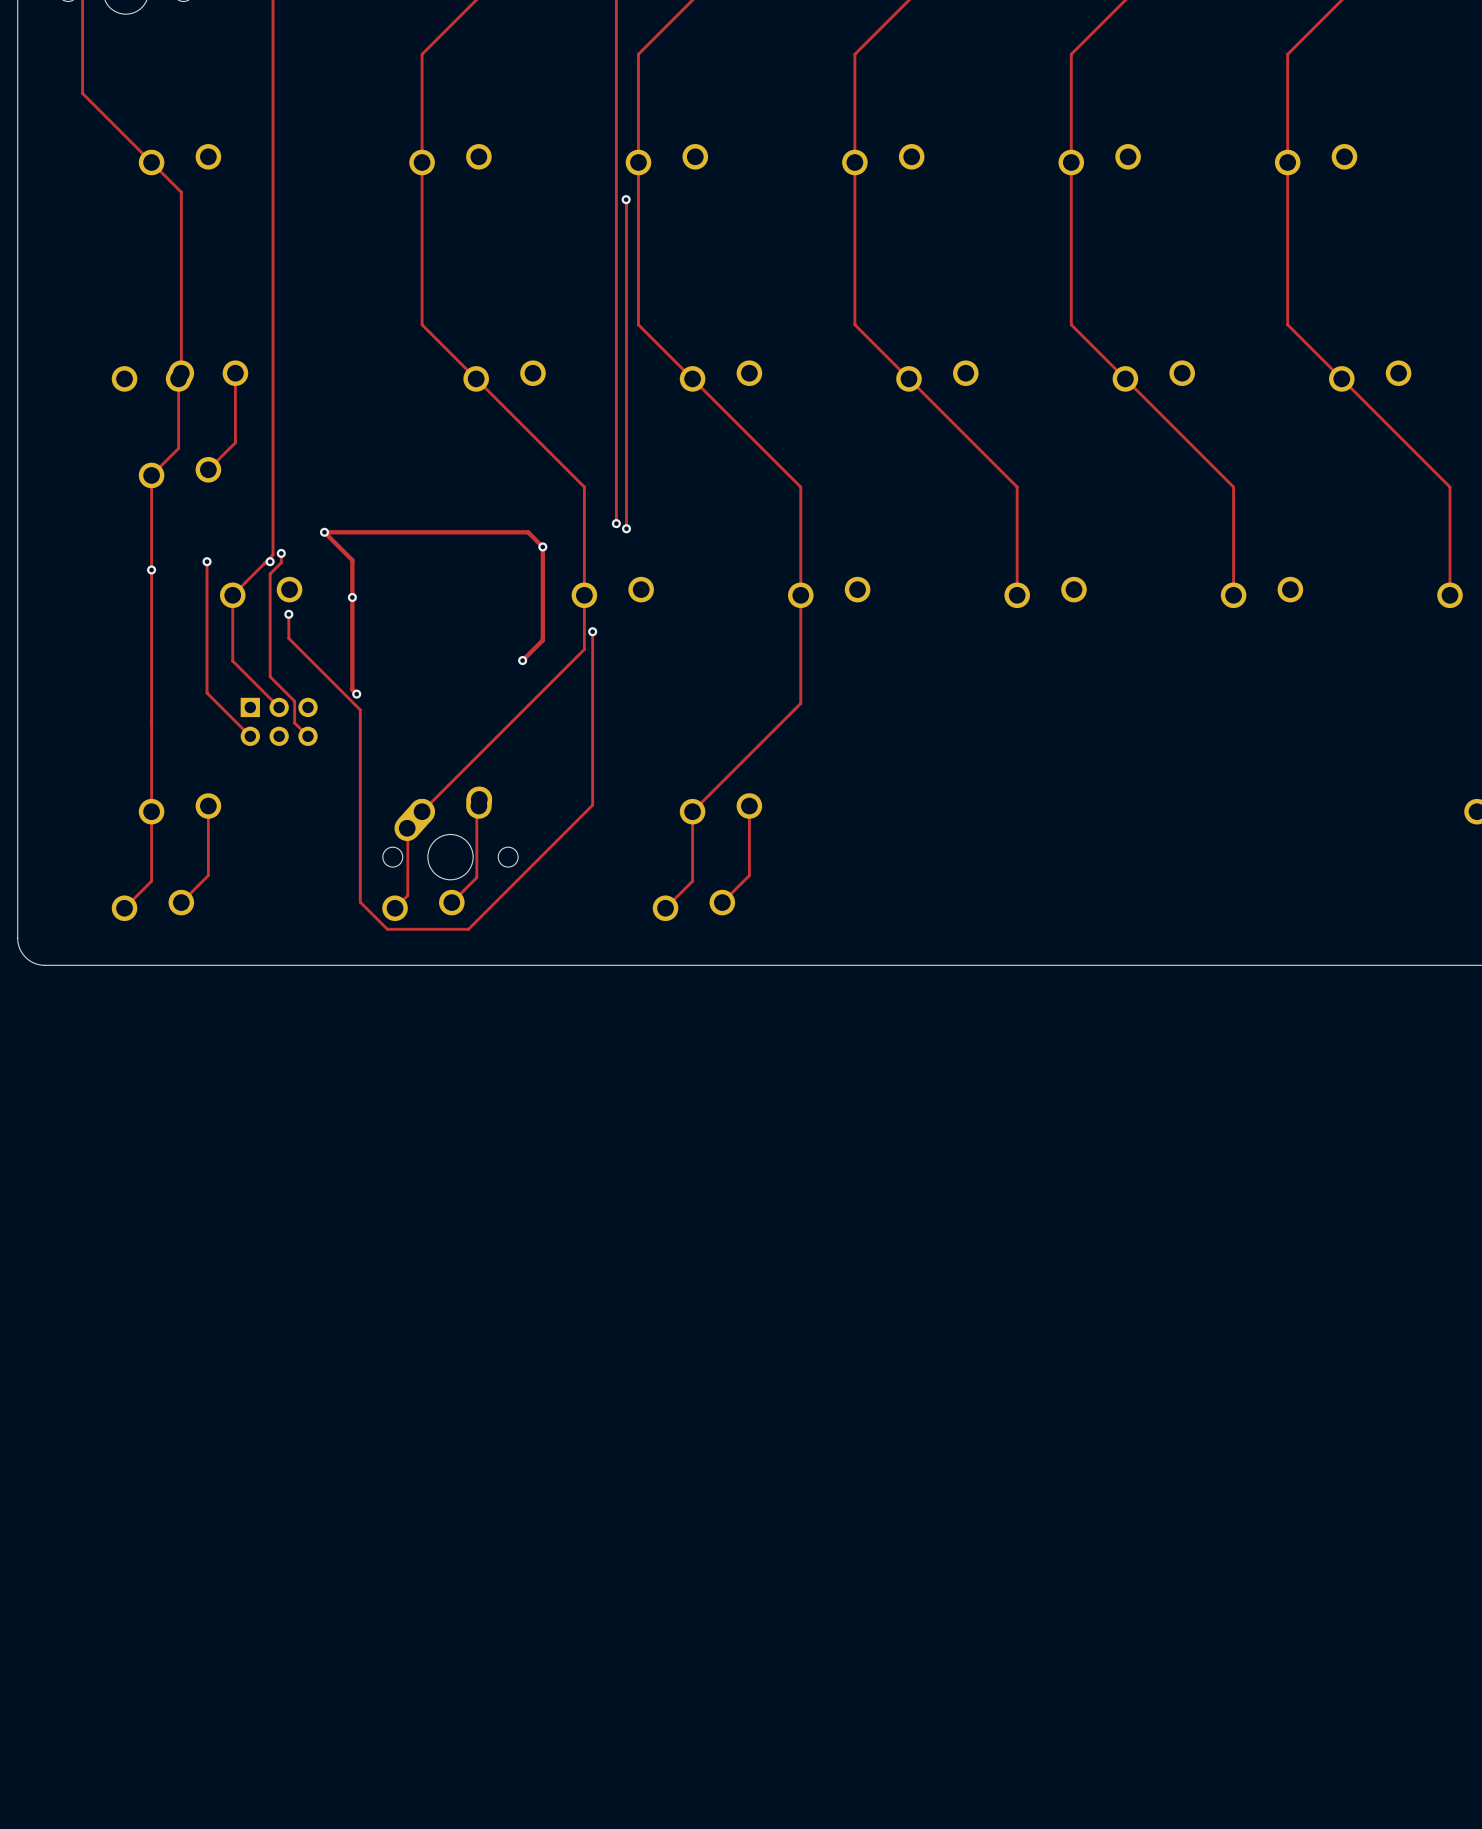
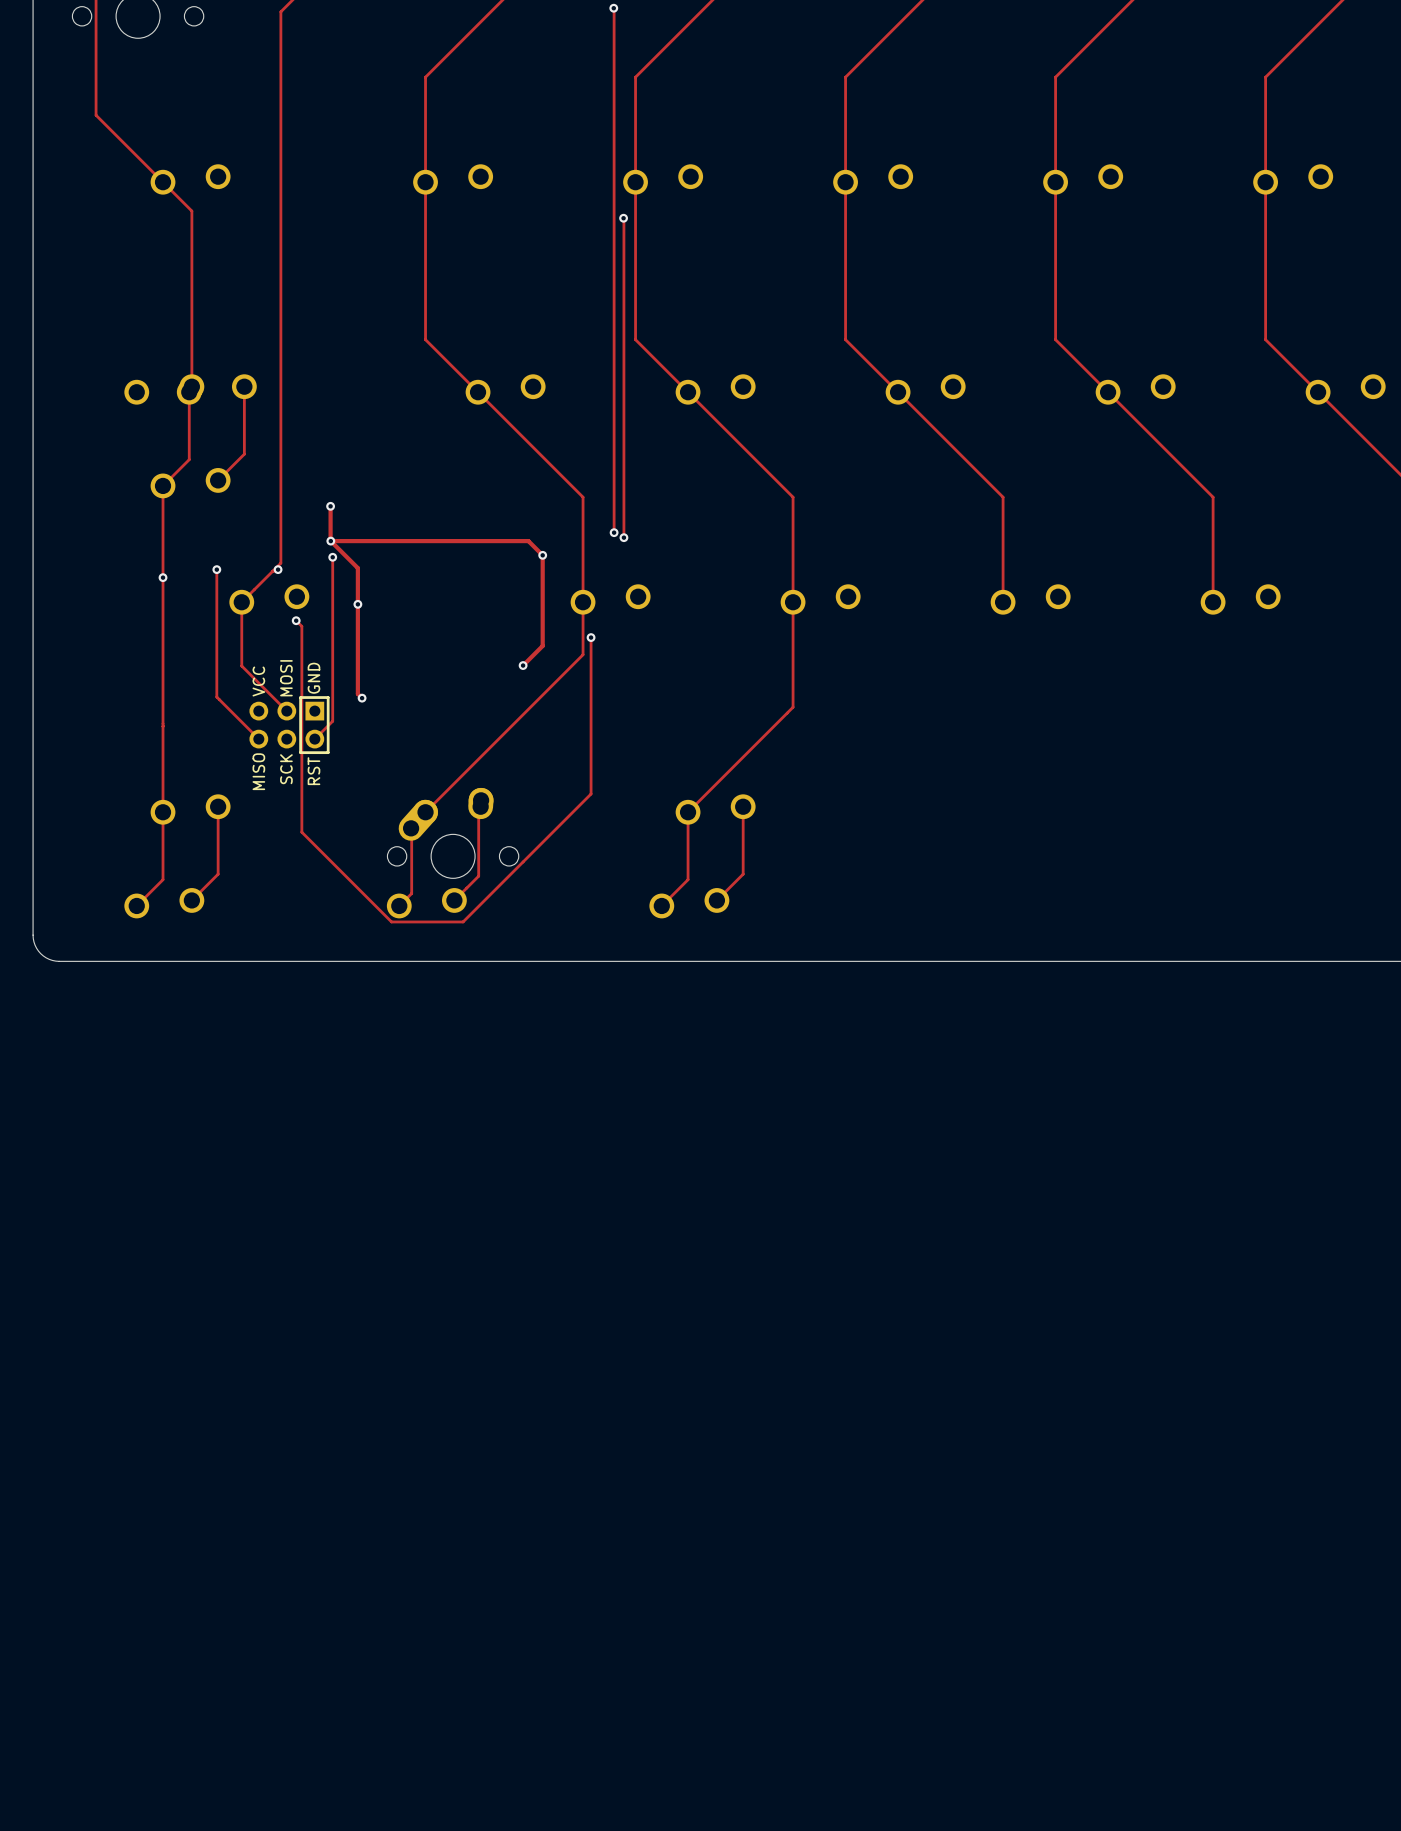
track: none -> (330, 506) (330, 540)
via: none -> (330, 506)
via: none -> (332, 557)
track: (281, 553) (281, 562) (270, 573) (270, 676) (294, 701) -> (296, 620) (301, 626) (301, 705)
via: (281, 553) -> none
track: (288, 614) (288, 638) (360, 709) (360, 902) (387, 929) (468, 929) (592, 805) (592, 792) -> (301, 726) (301, 832) (391, 921) (463, 921) (591, 794)
part side: bottom (279, 721) -> top (289, 725)
track: (294, 722) (308, 736) -> (332, 557) (332, 721) (314, 739)

